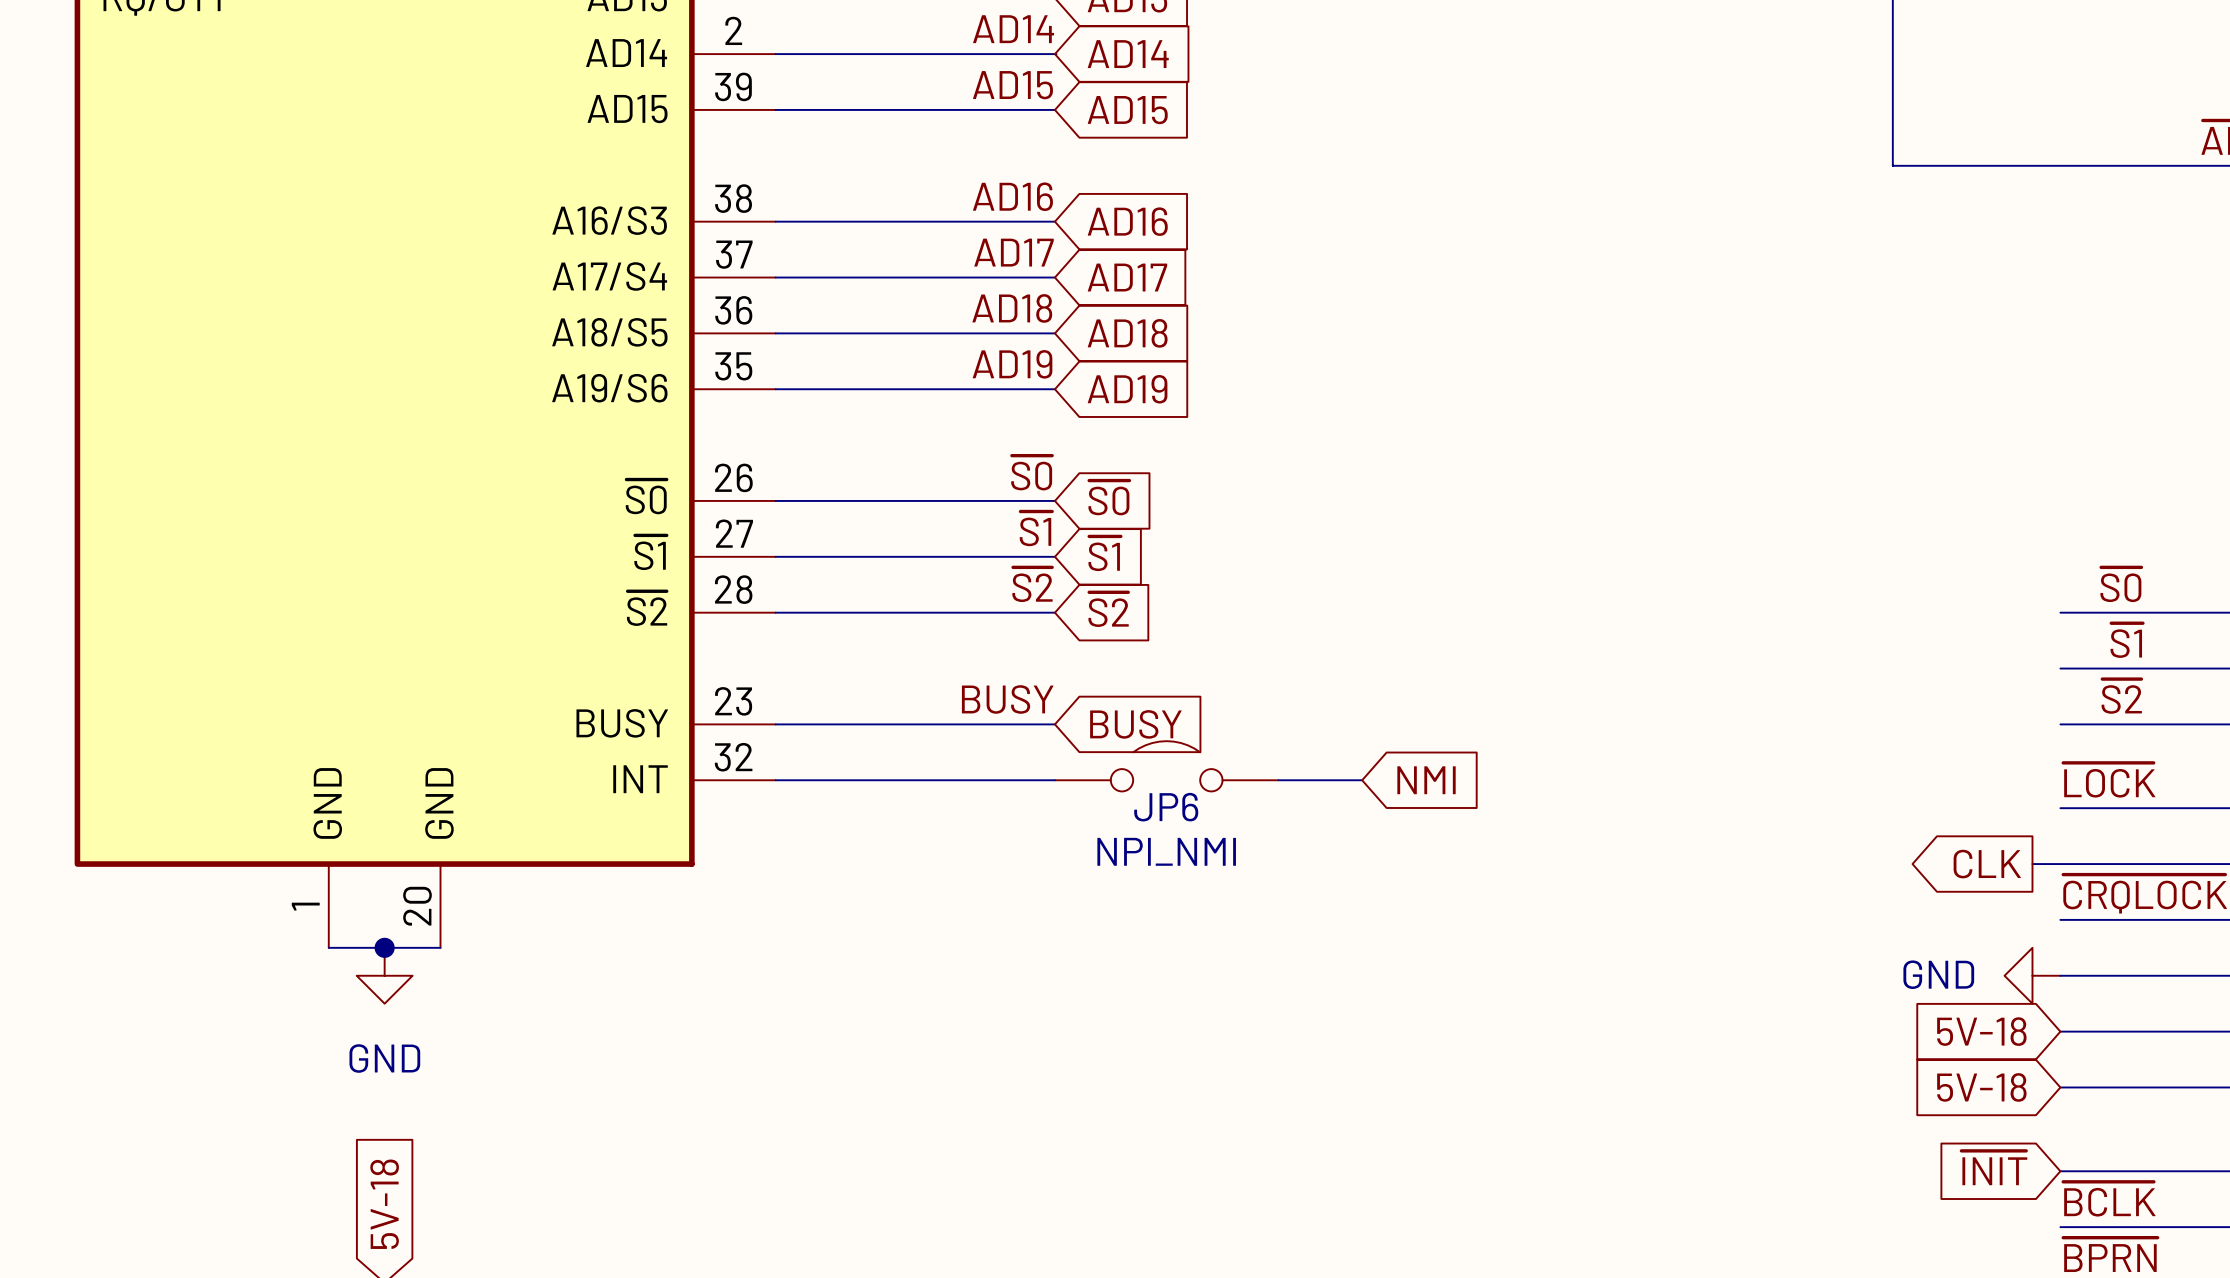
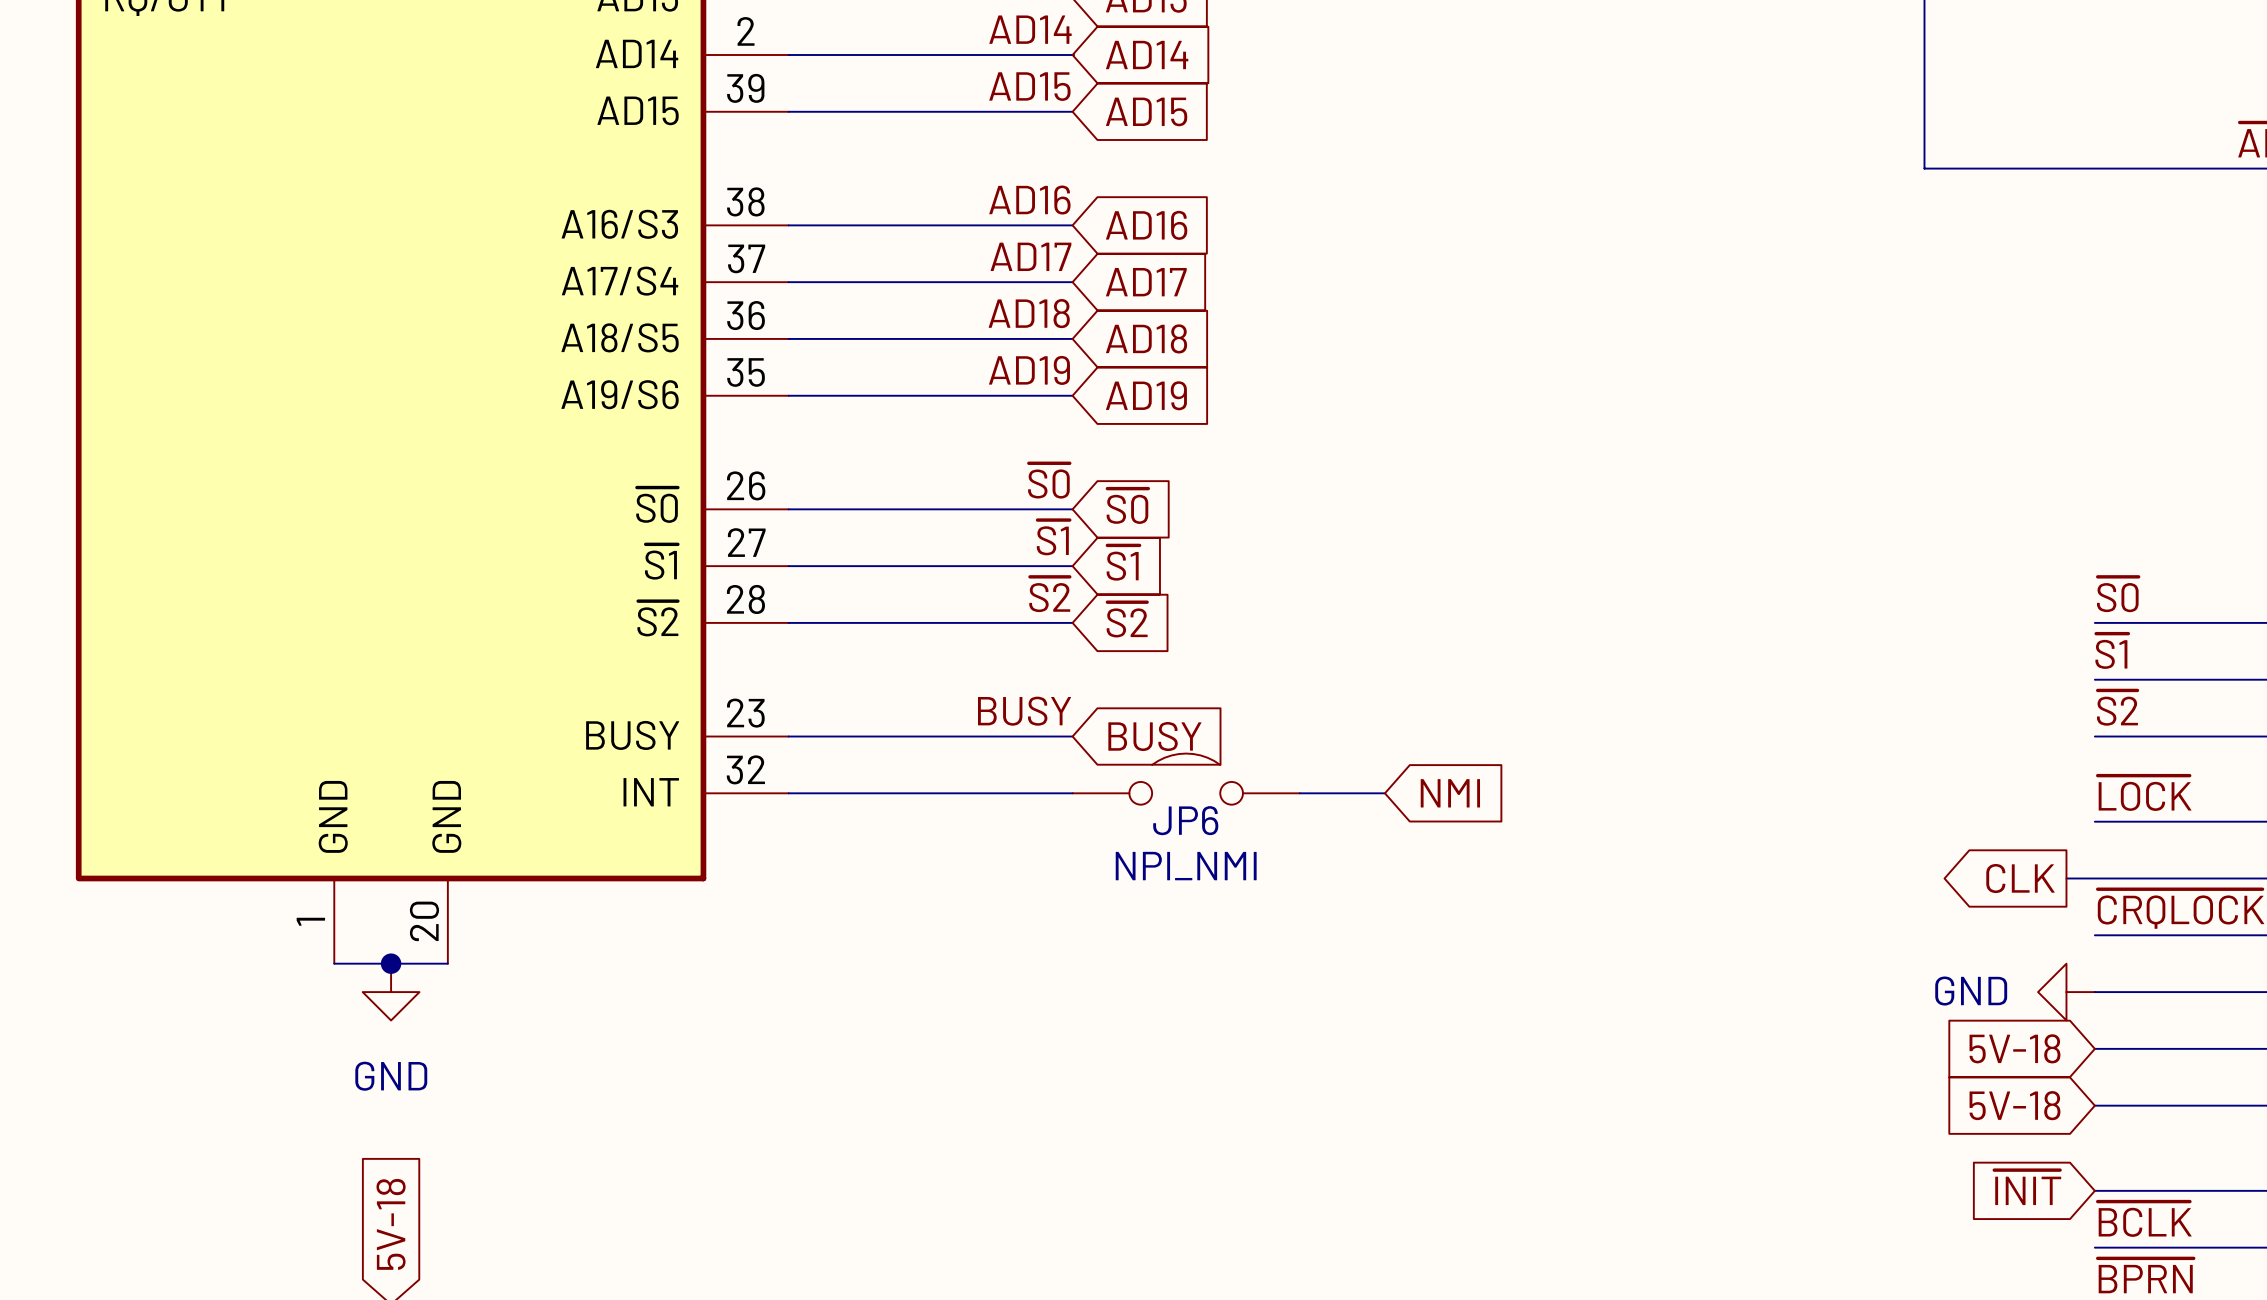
label position: ~{S0} (2120, 584) -> ~{S0} (2117, 594)
label position: ~{S1} (2126, 640) -> ~{S1} (2111, 651)
label position: ~{S2} (2121, 696) -> ~{S2} (2117, 708)

